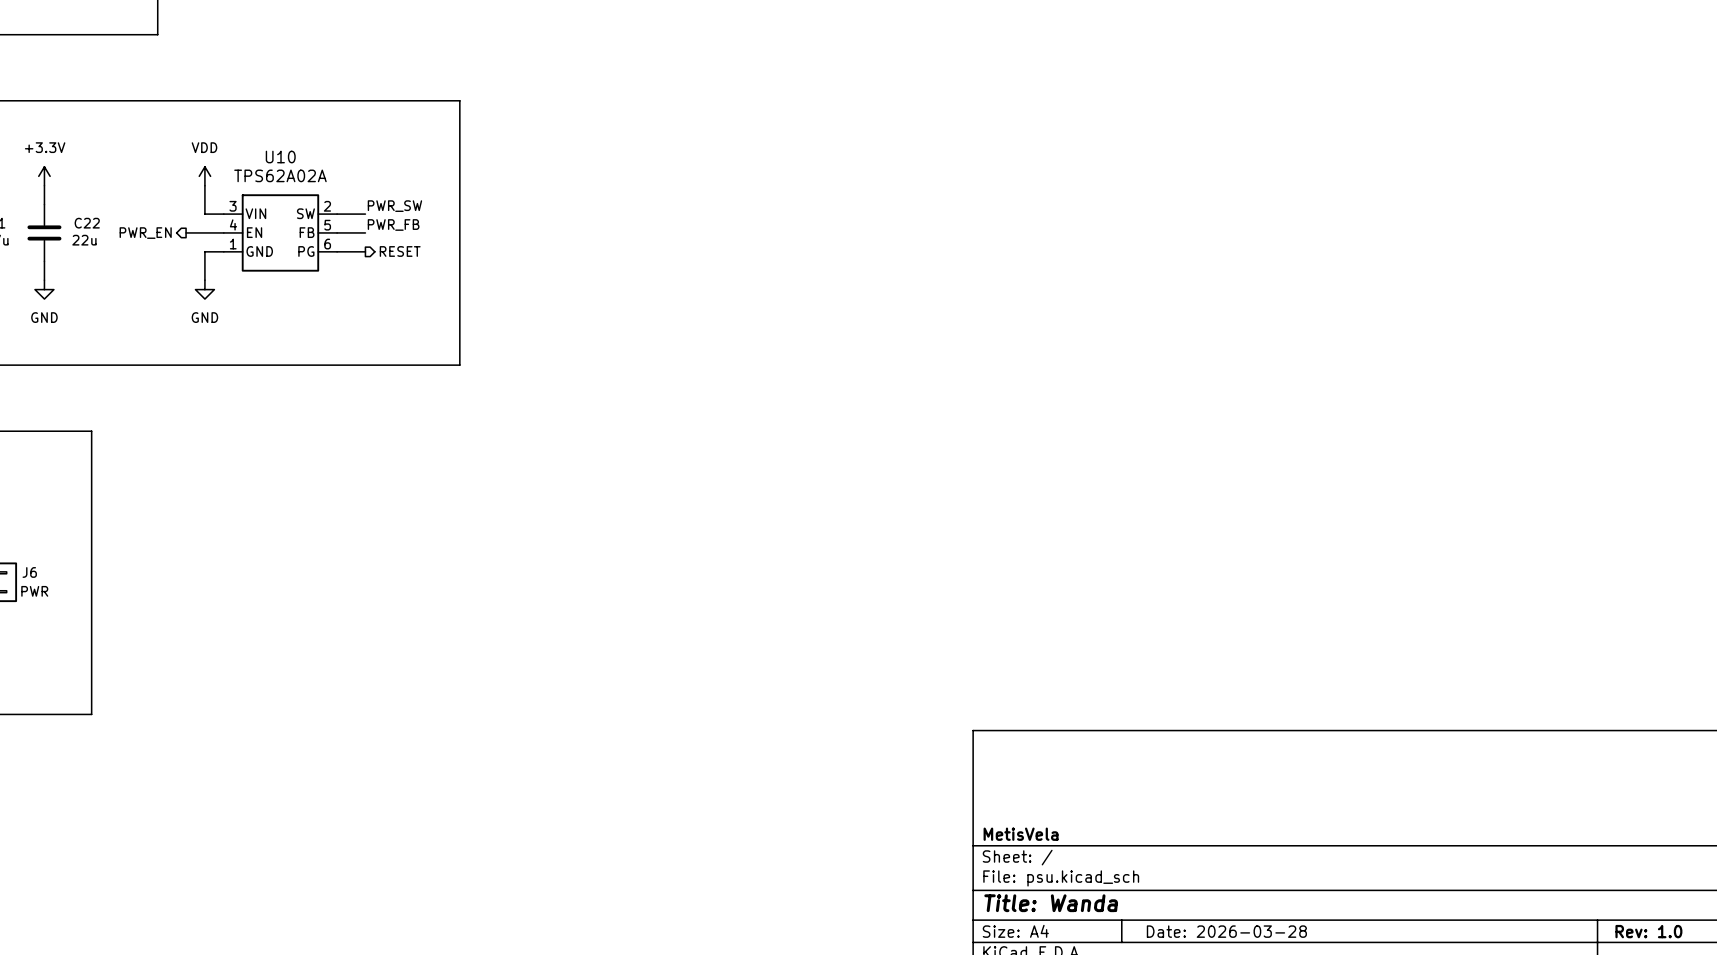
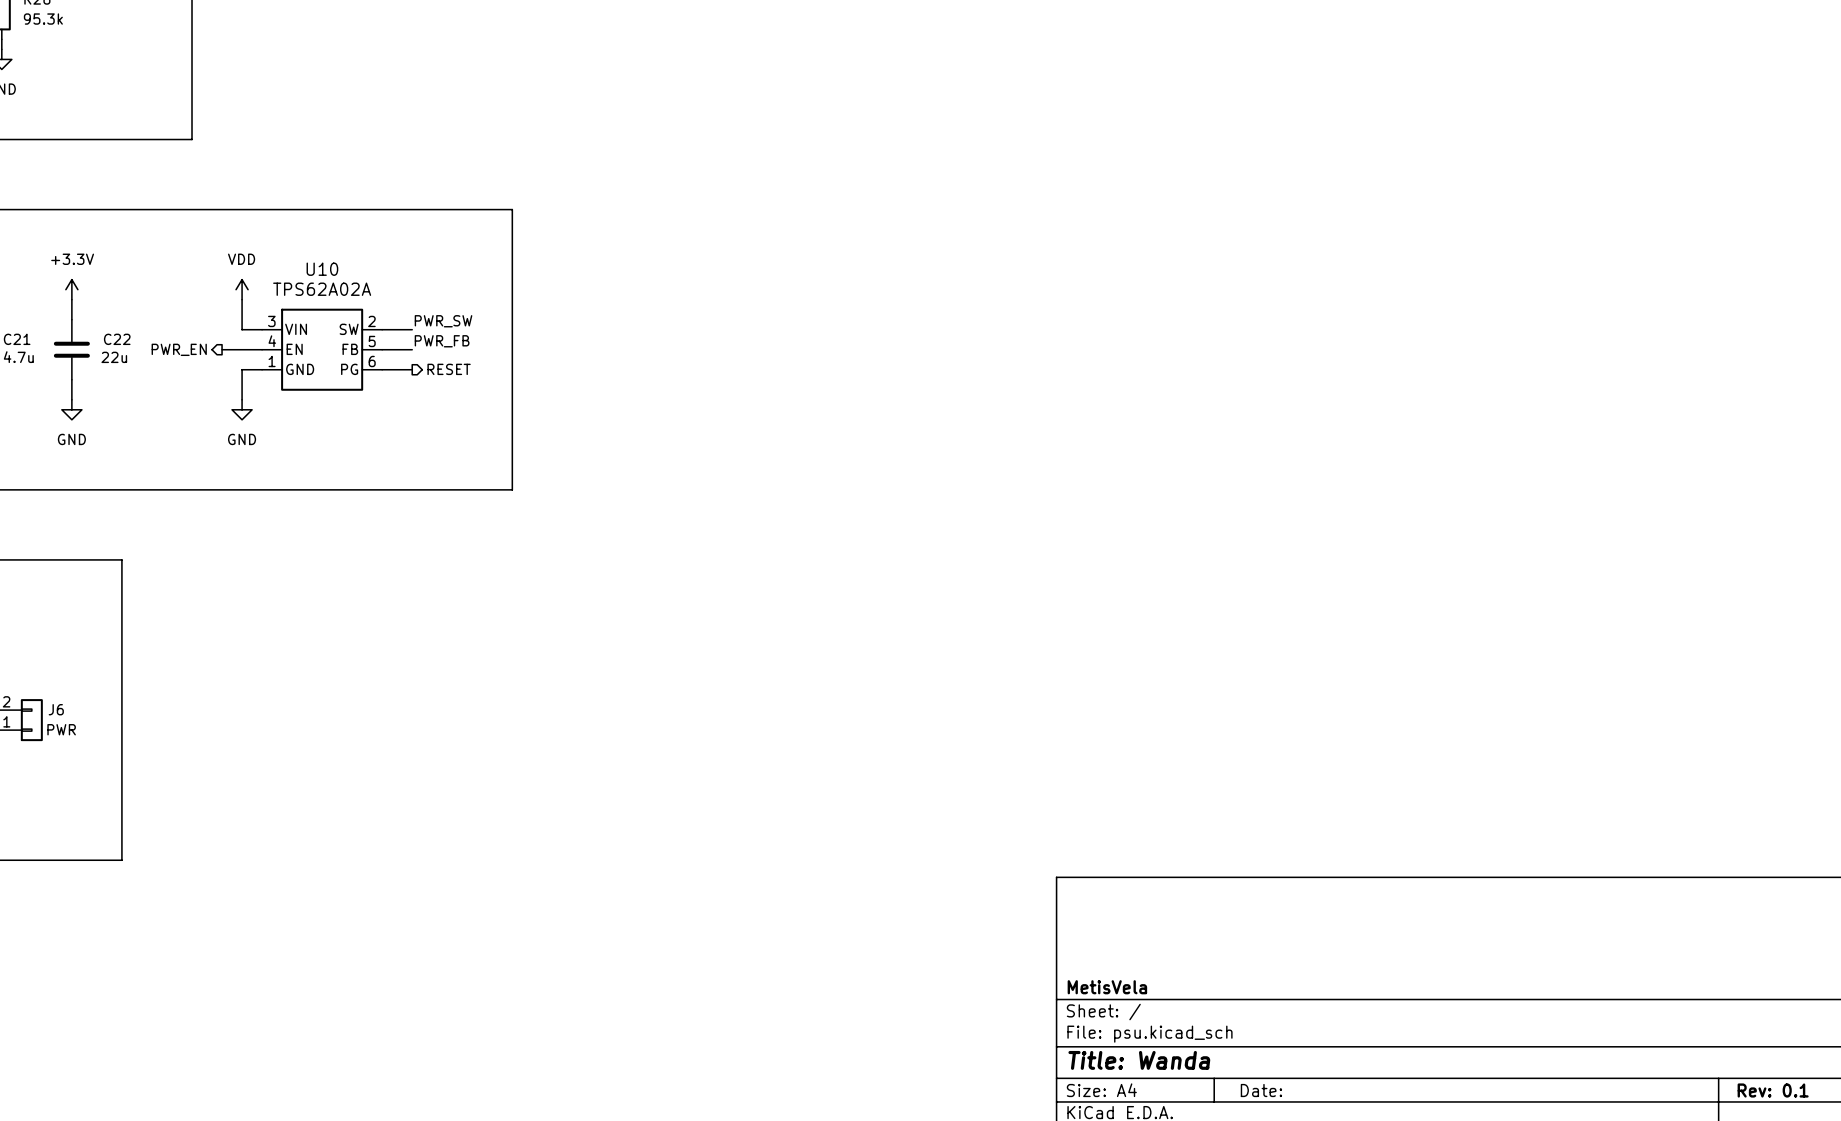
title block: Date: 2026-03-28 (1226, 931) -> Date: (1261, 1090)
title block: Rev: 1.0 (1648, 931) -> Rev: 0.1 (1773, 1090)

